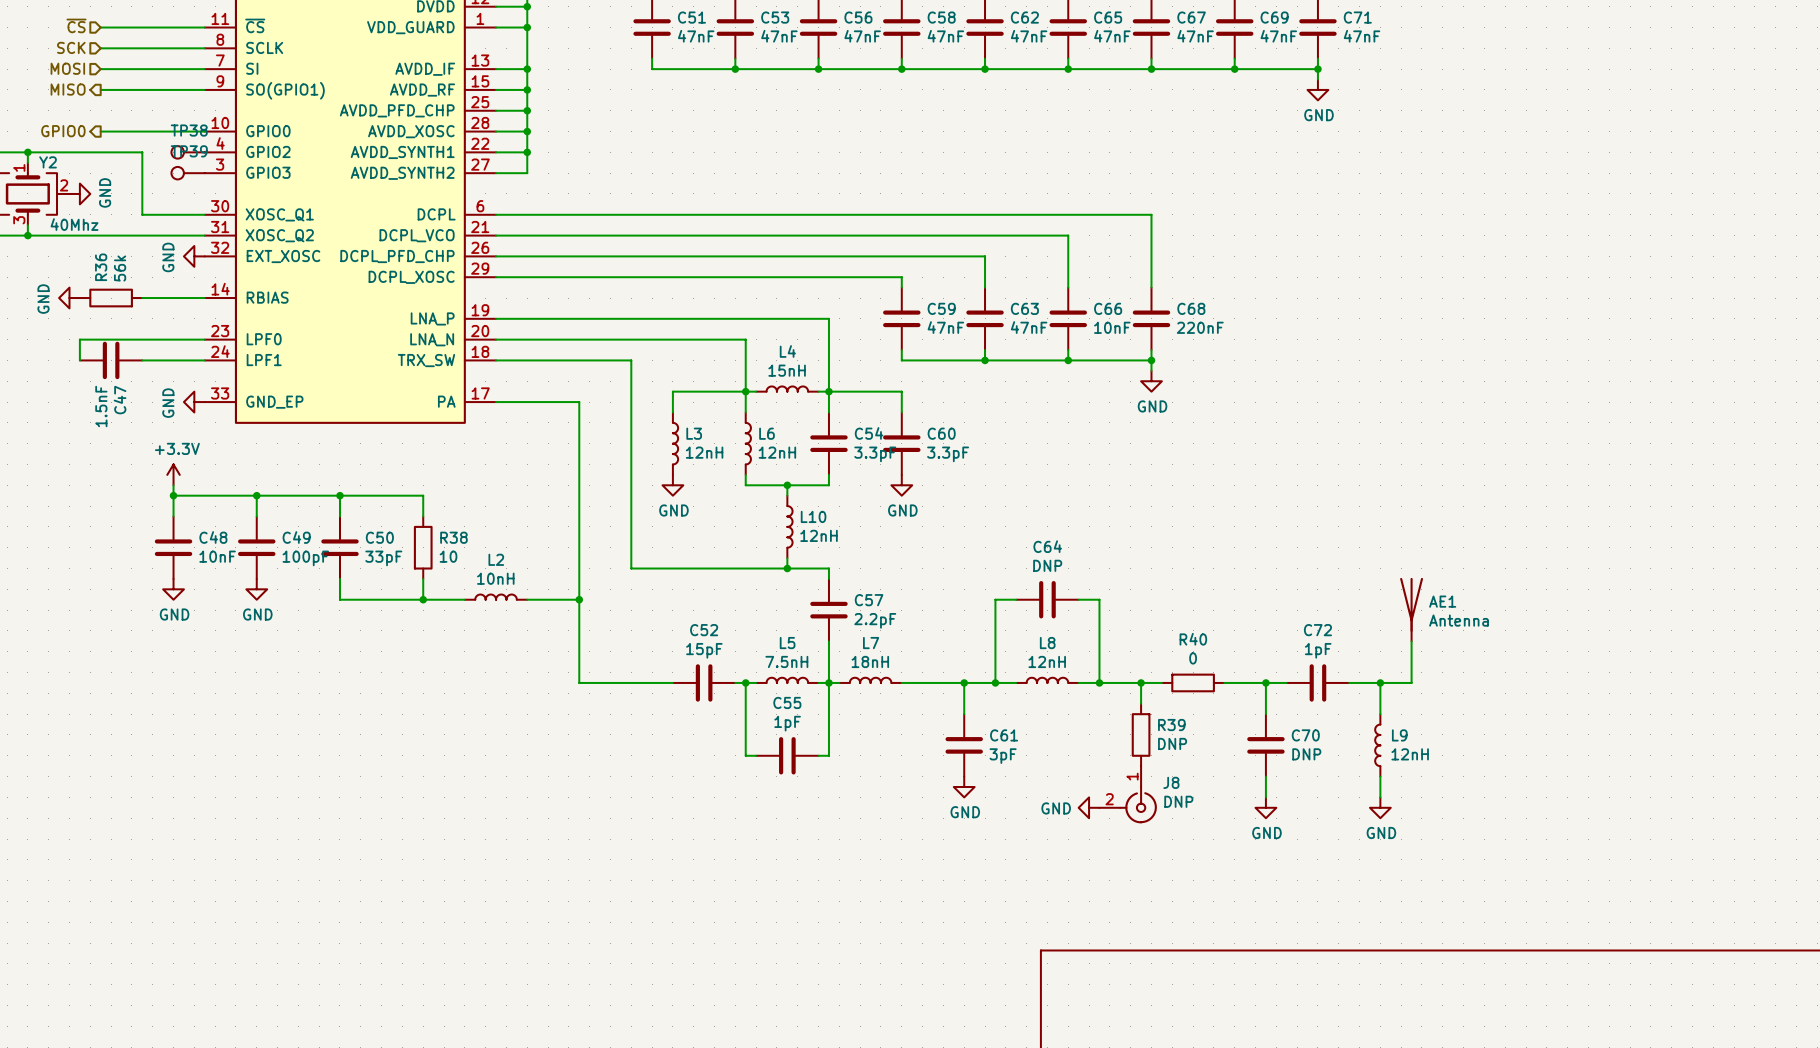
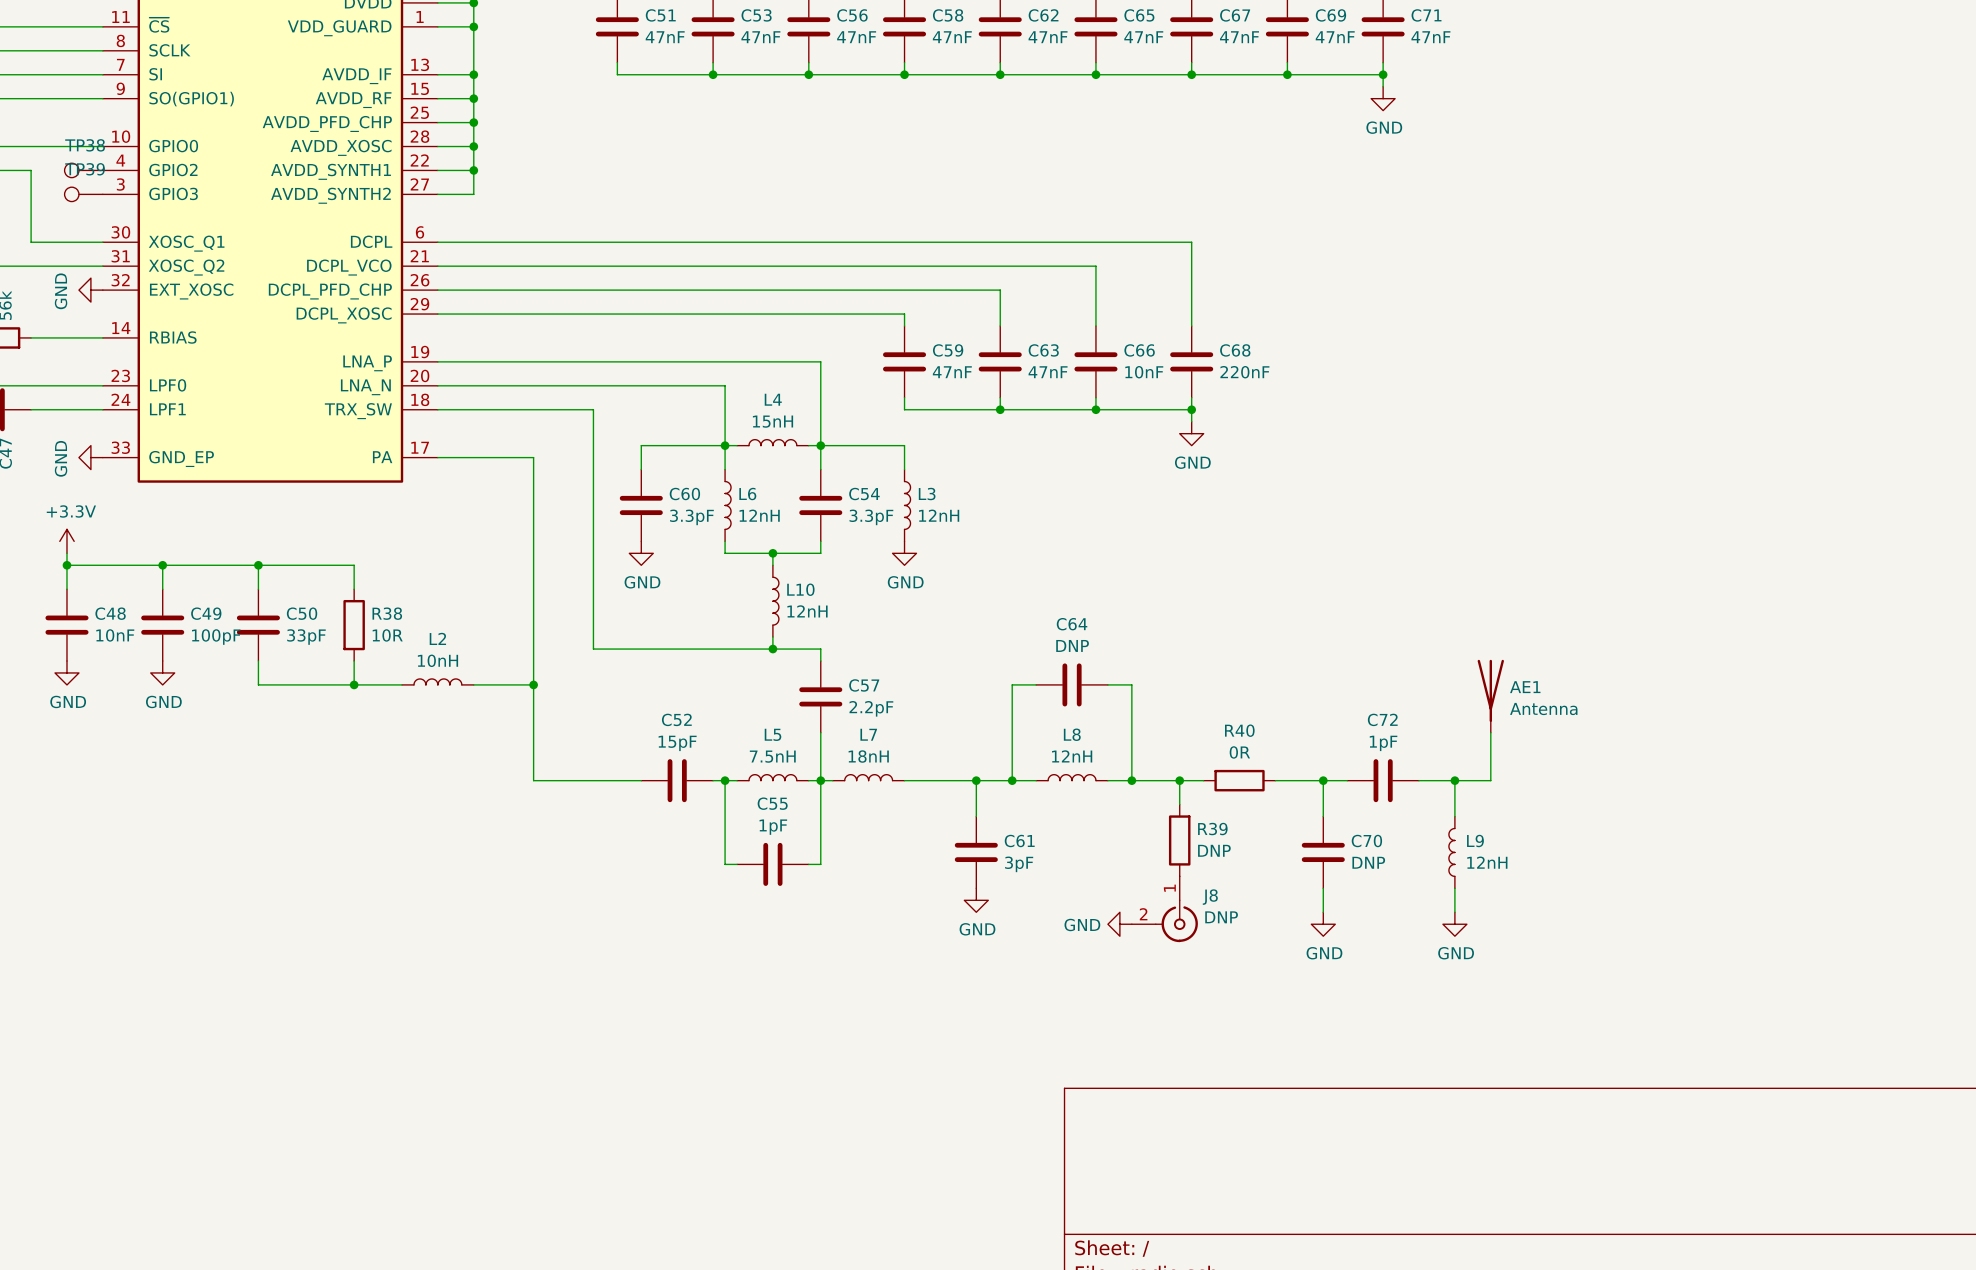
L3 position: (675, 443) -> (907, 505)
C60 position: (901, 443) -> (641, 505)
R38 value: 10 (448, 556) -> 10R (387, 635)
R40 value: 0 (1193, 658) -> 0R (1239, 752)

